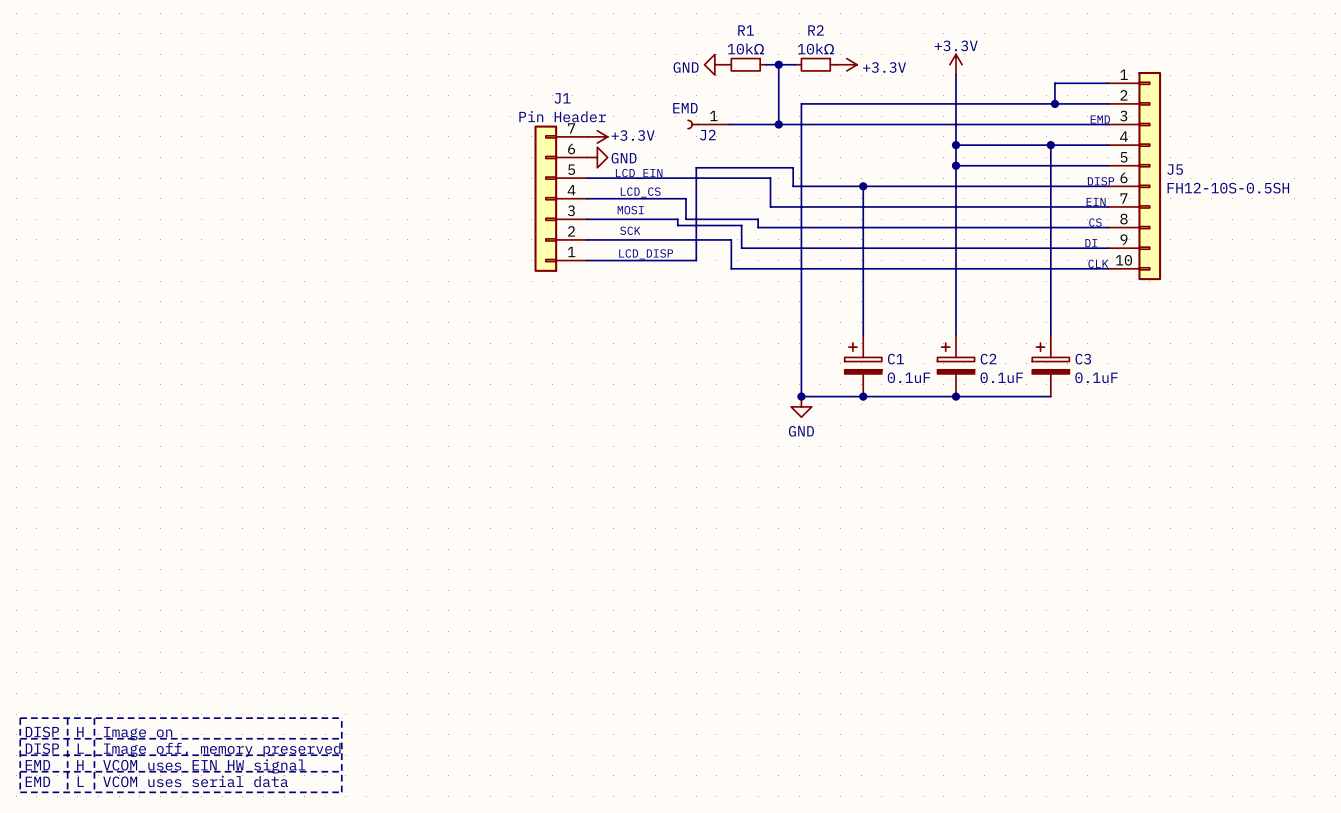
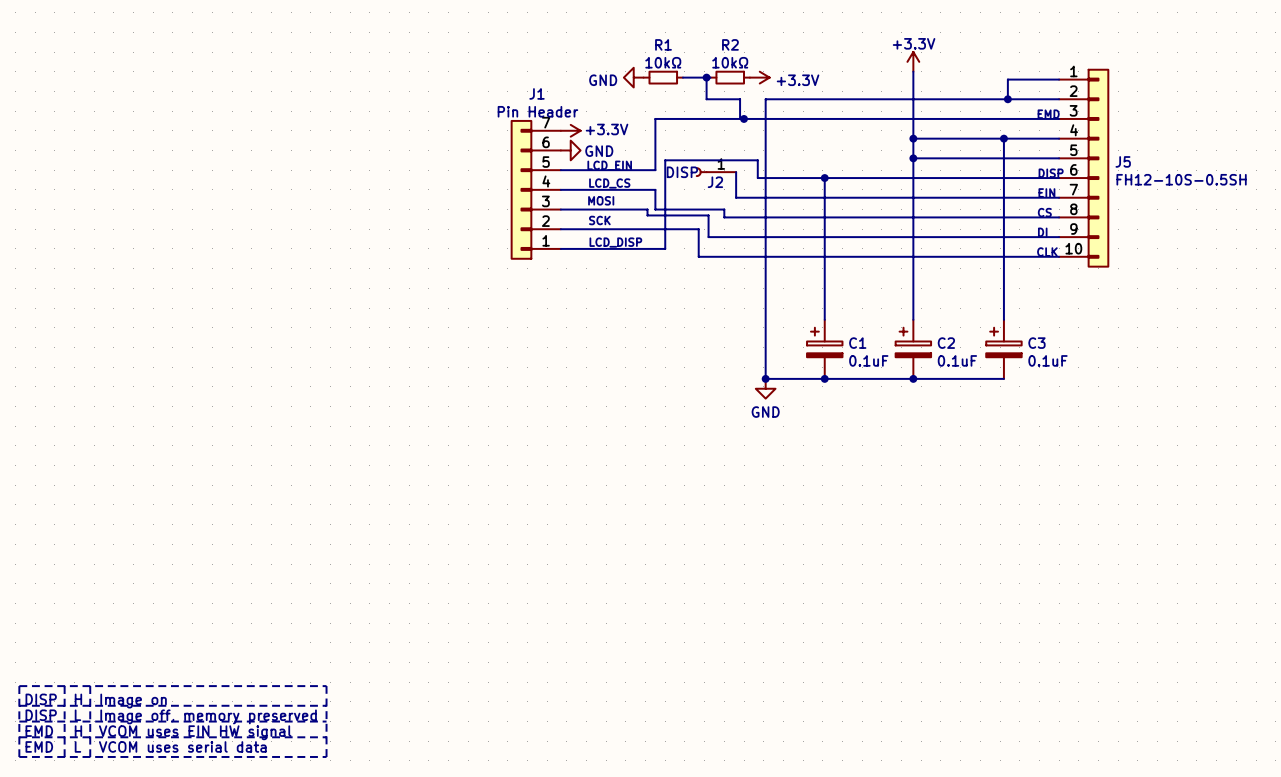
power symbol position: GND (714, 64) -> GND (633, 77)
R1 position: (745, 64) -> (663, 77)
wire: (766, 64) (795, 64) -> (682, 77) (710, 77)
wire: (778, 64) (778, 124) -> none
junction position: (778, 64) -> (706, 77)
R2 position: (815, 64) -> (730, 77)
power symbol position: +3.3V (846, 64) -> +3.3V (759, 77)
wire: none -> (706, 77) (706, 99) (740, 99) (740, 118)
J2 value: EMD (685, 108) -> DISP (682, 172)
J2 position: (708, 124) -> (716, 172)
wire: (686, 178) (770, 178) (770, 180) -> (655, 170) (655, 118) (696, 118)

